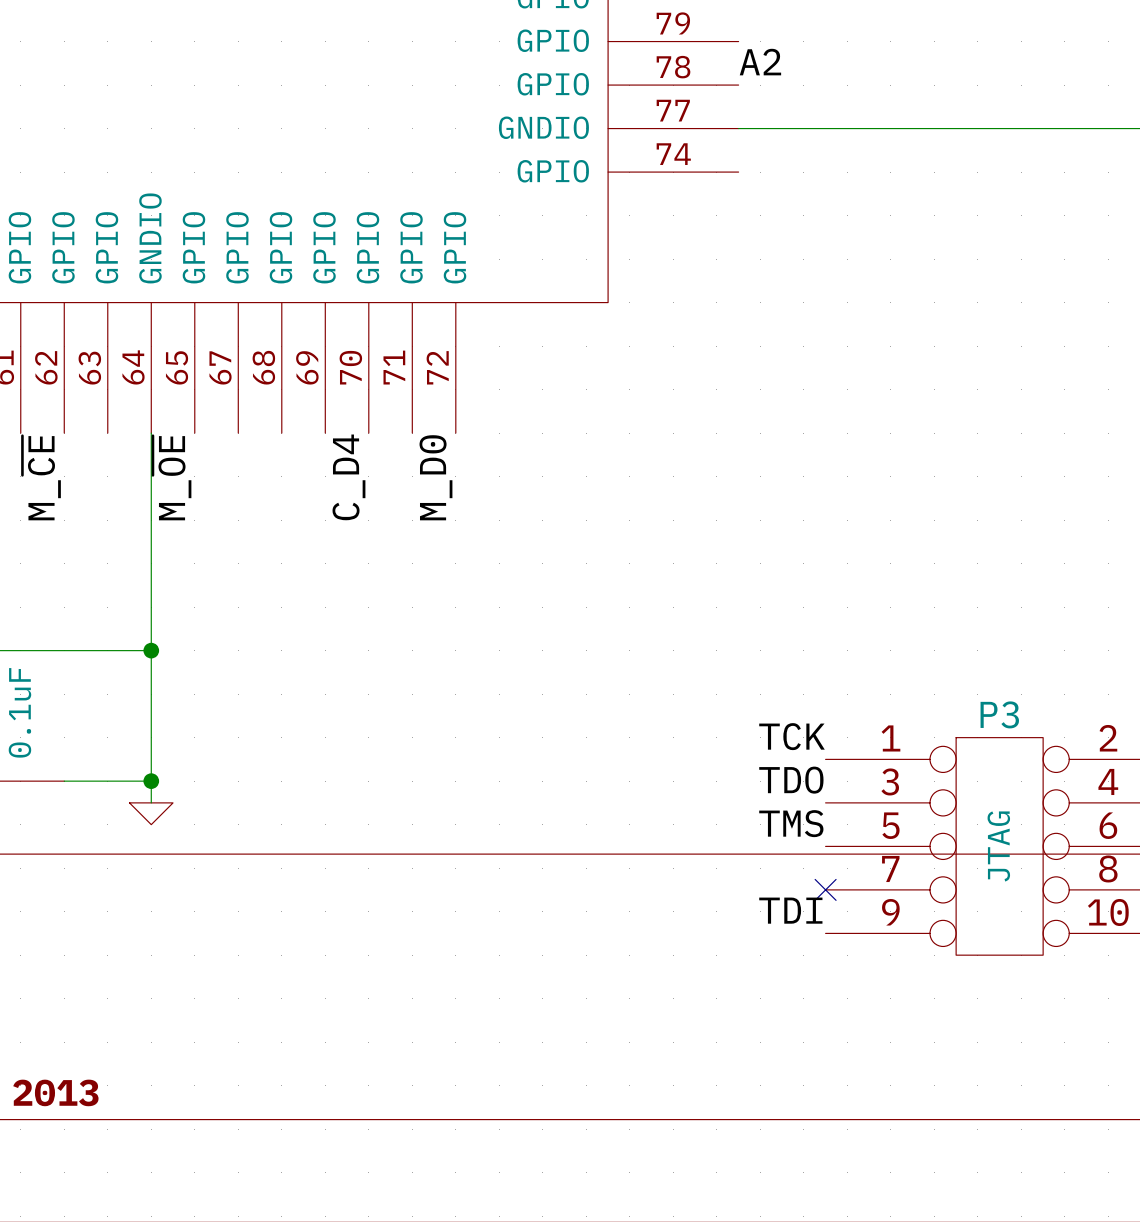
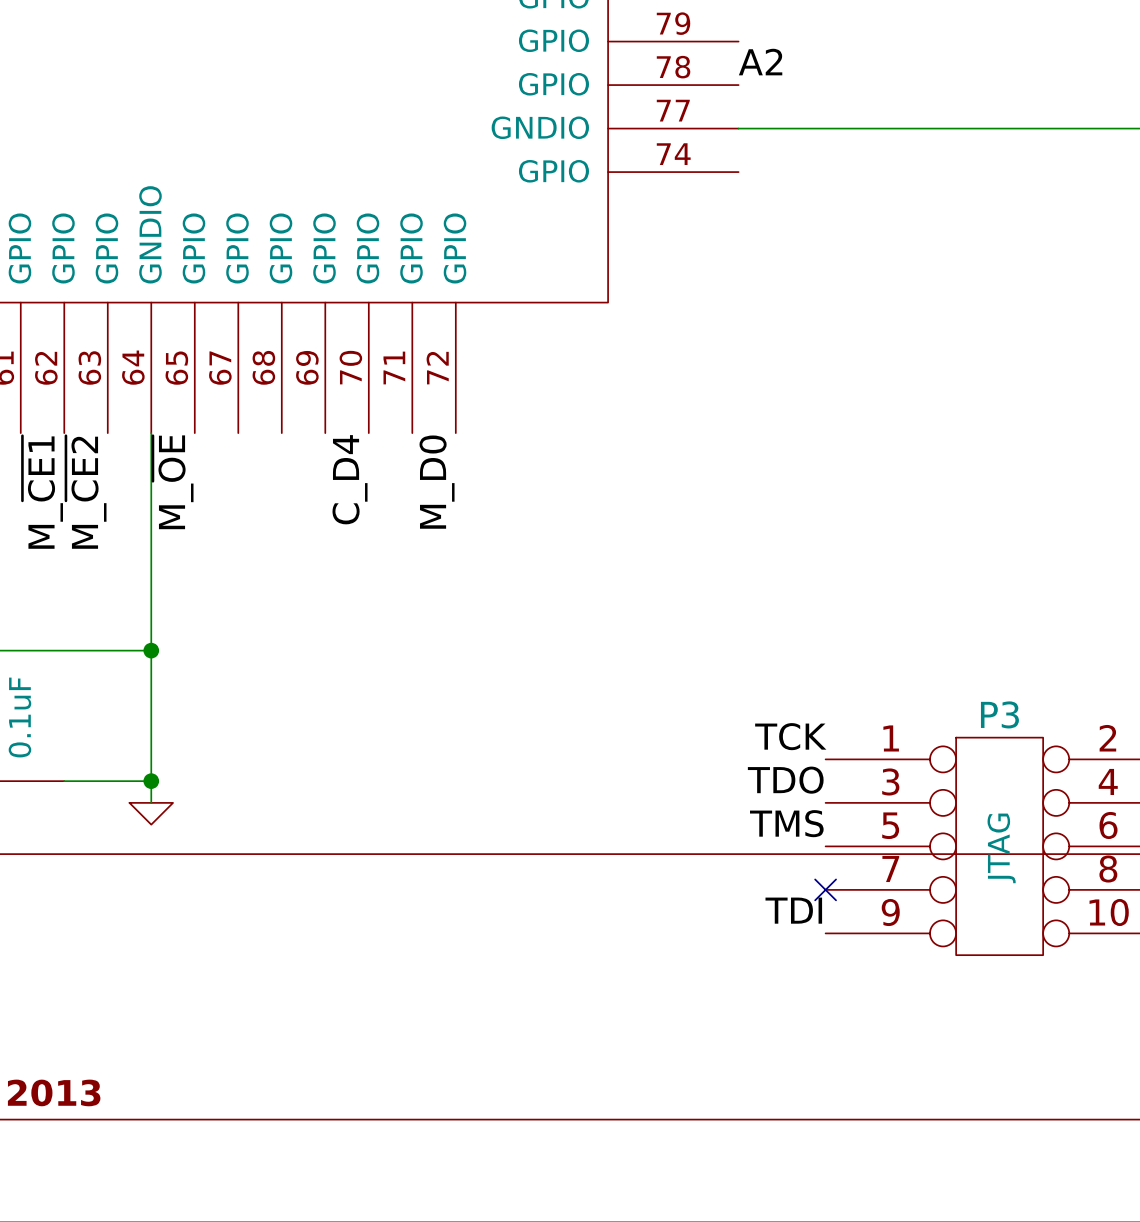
label: M_~{CE} (41, 478) -> M_~{CE1} (42, 492)
label: none -> M_~{CE2} (86, 492)

